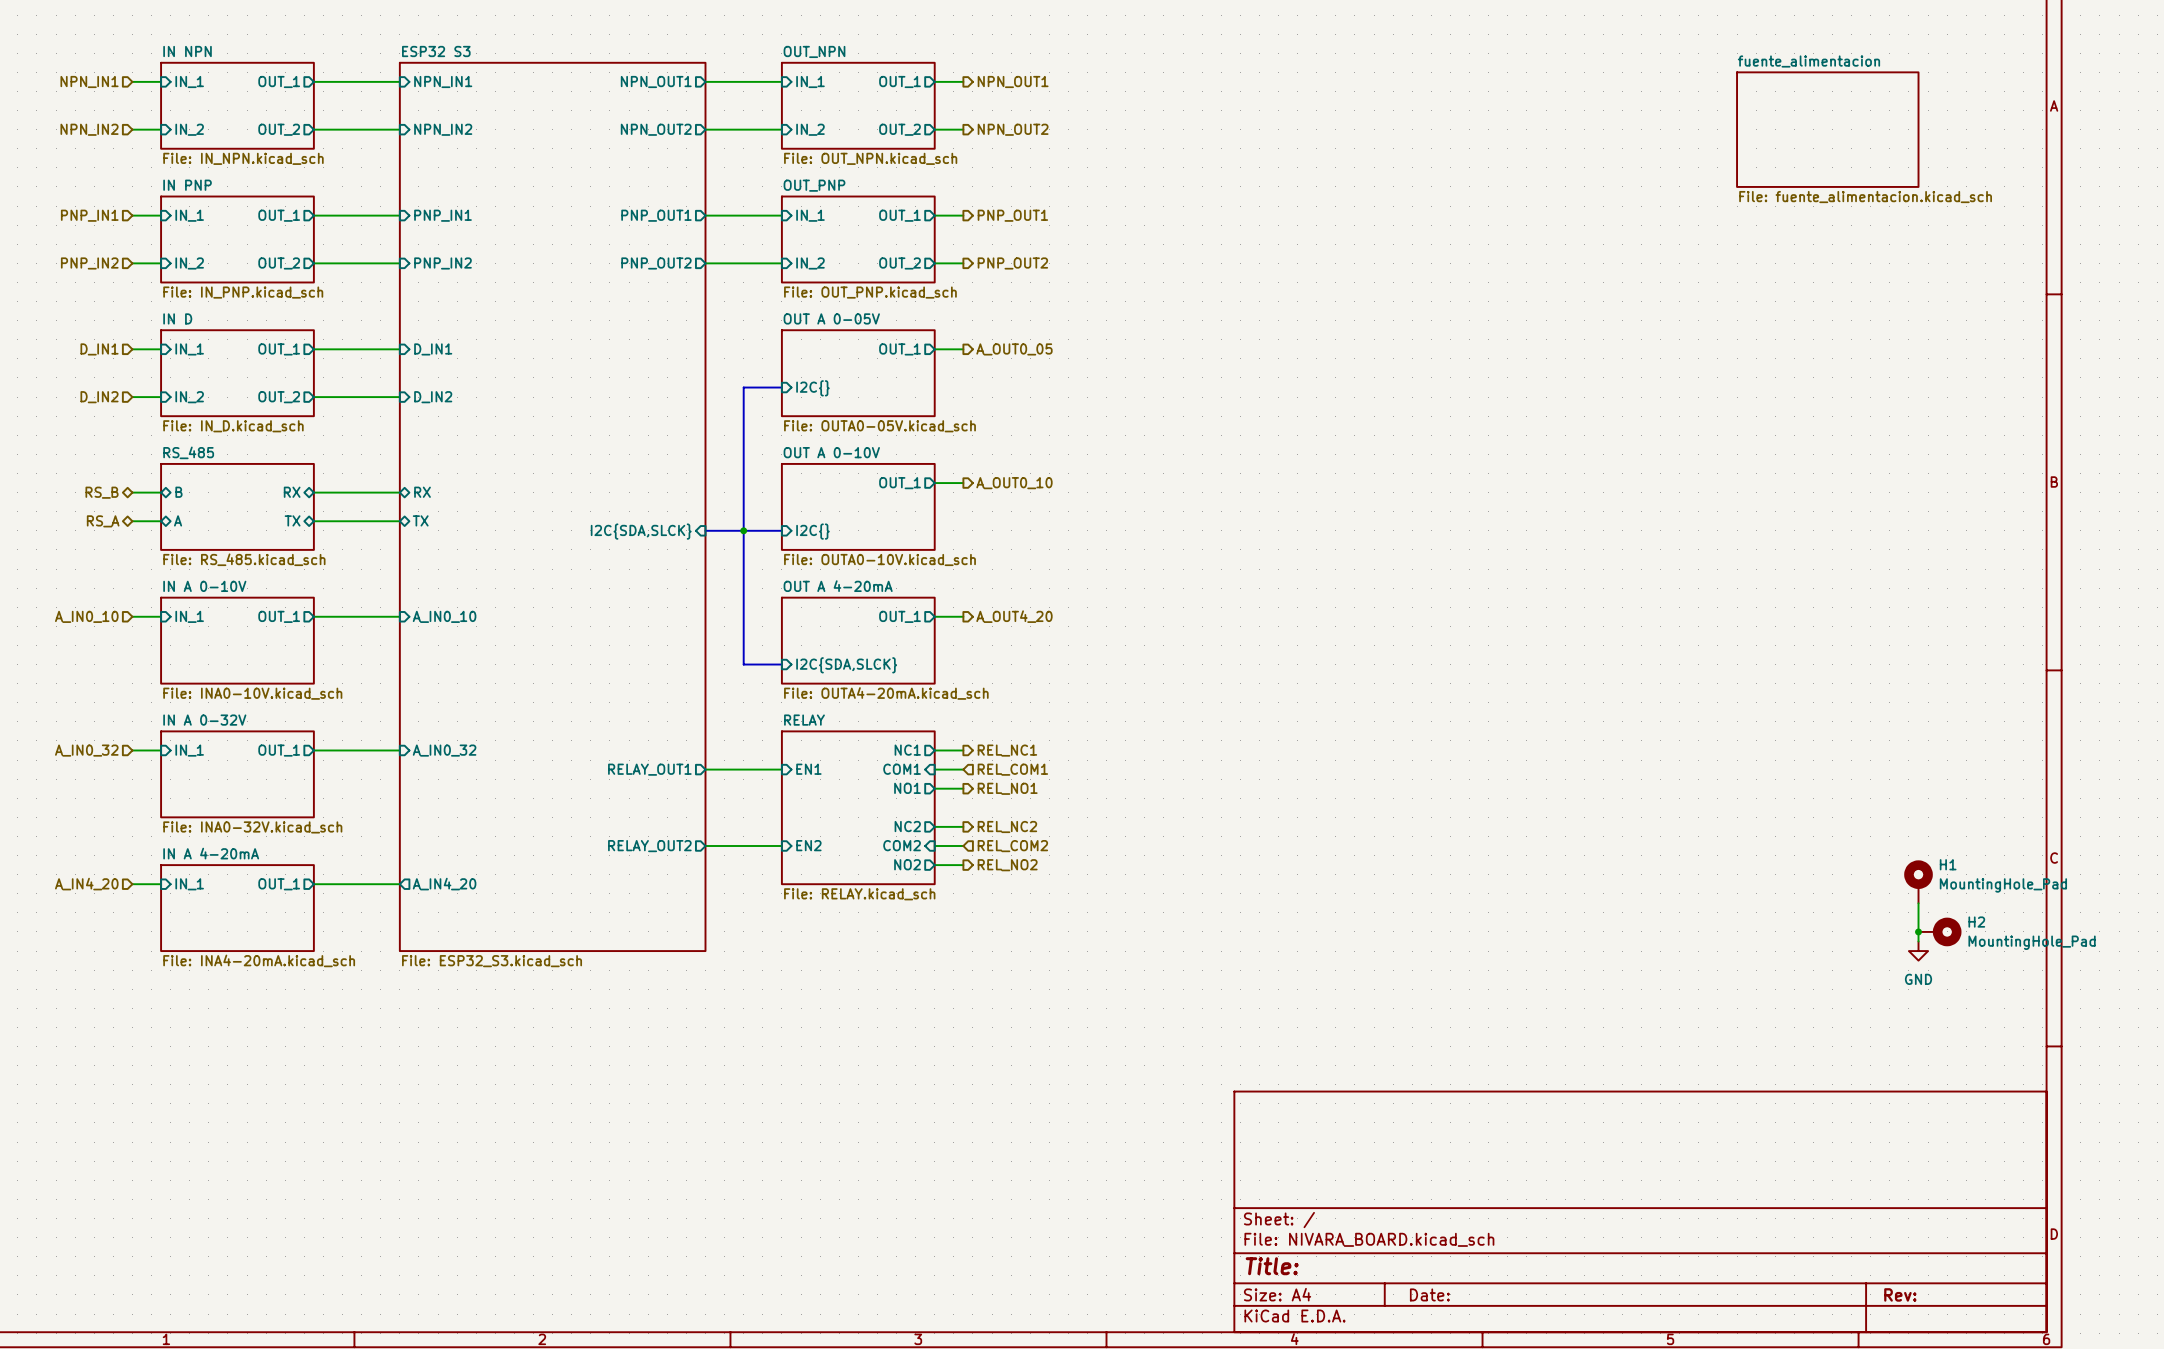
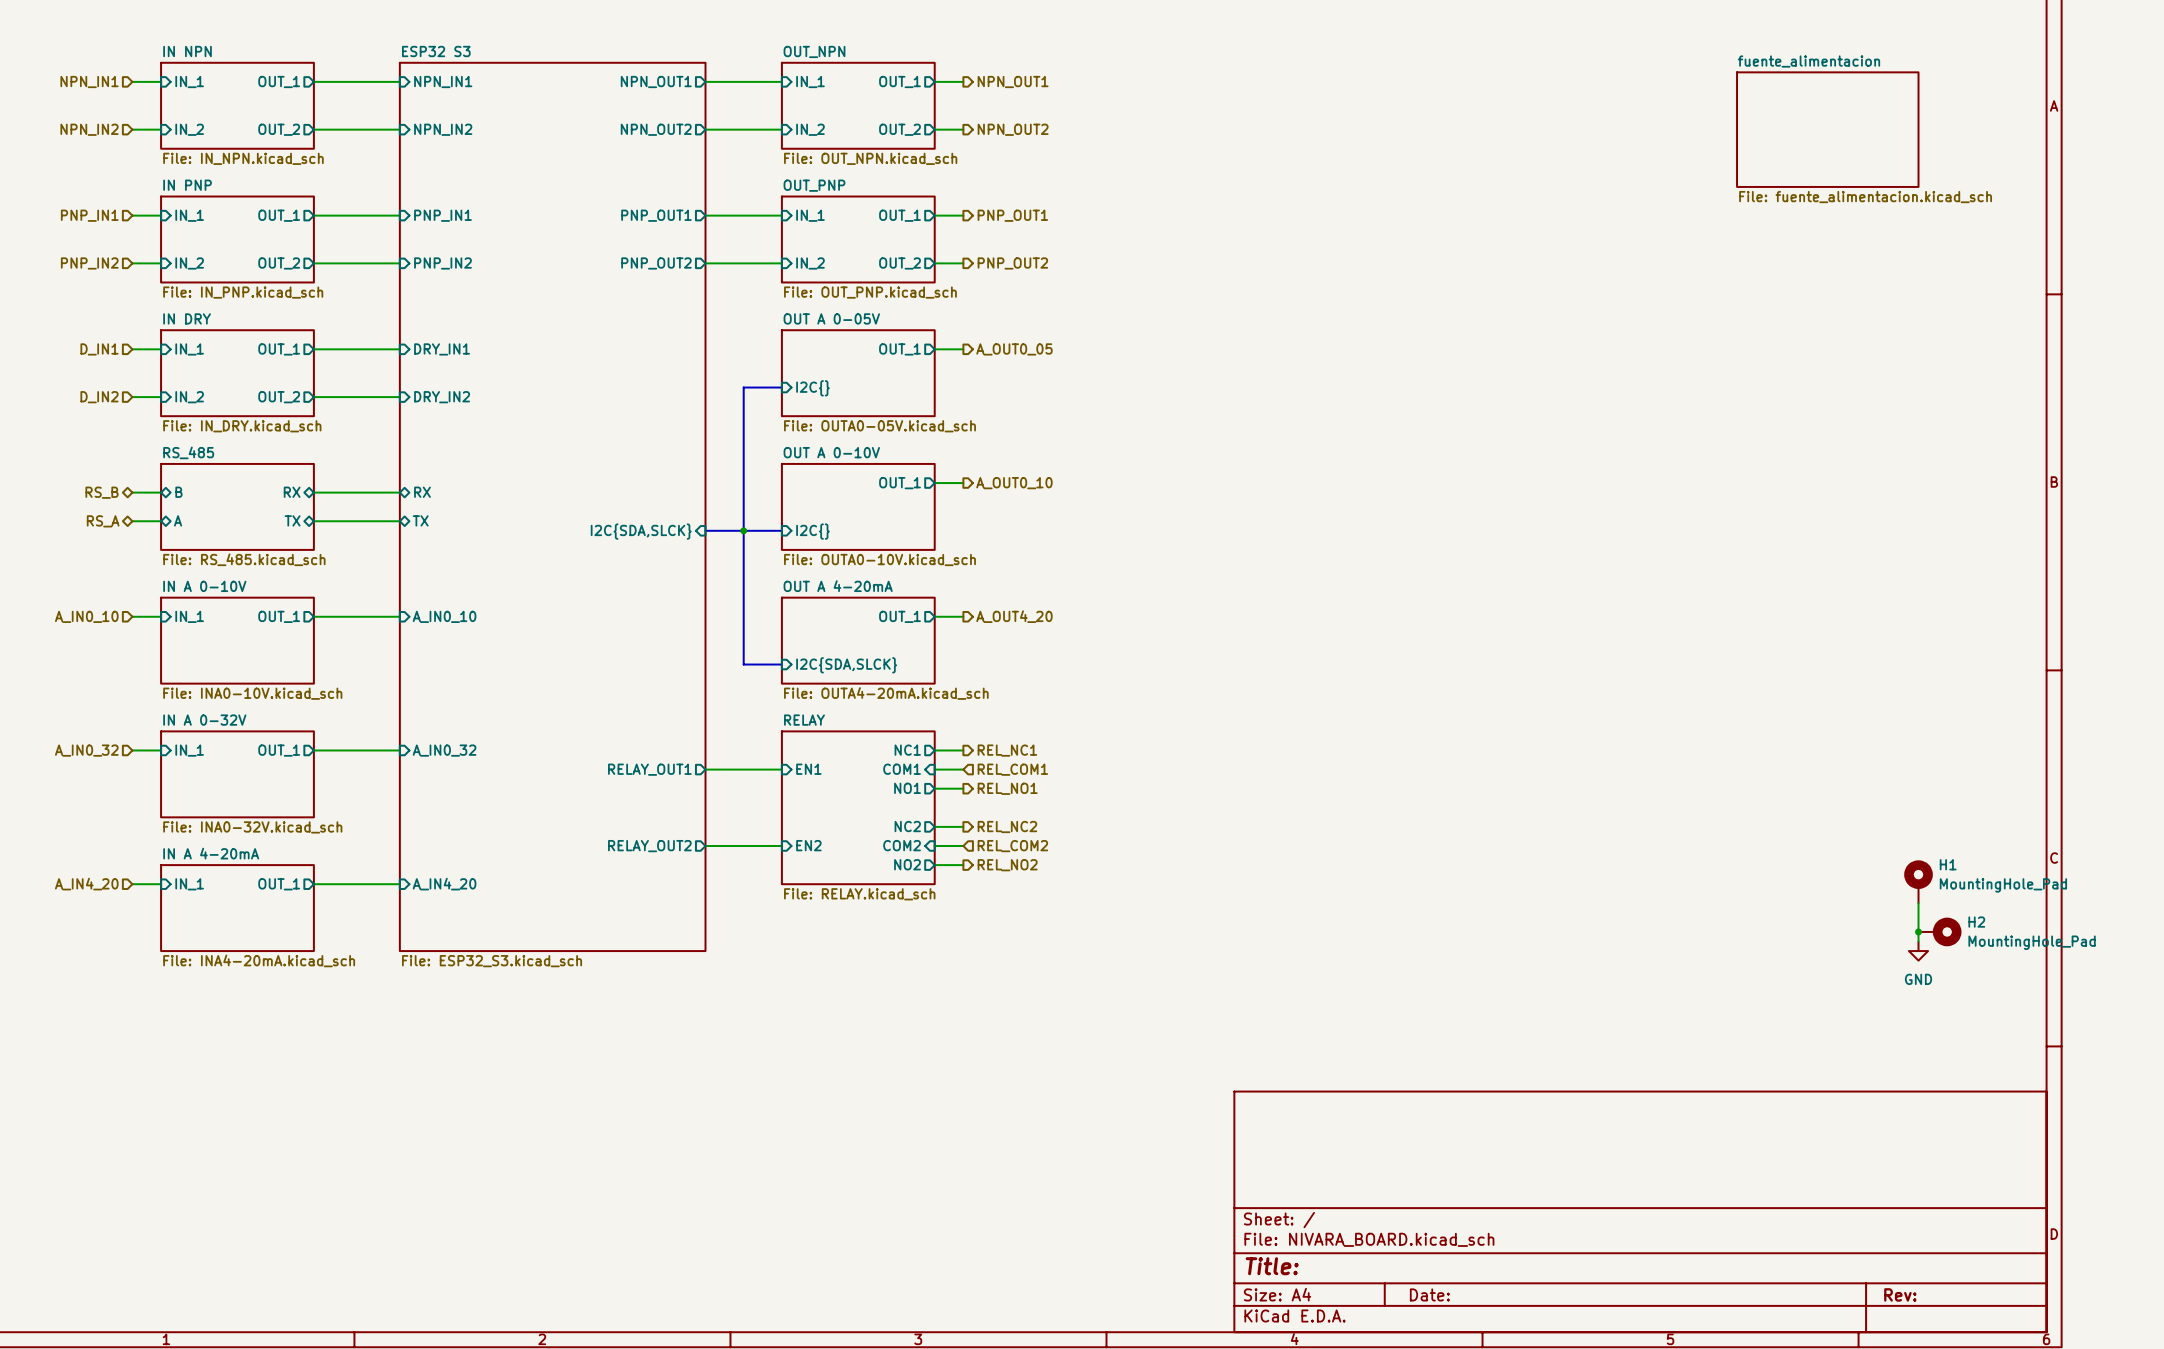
sheet IN D name: IN D (177, 318) -> IN DRY (187, 318)
sheet pin: D_IN1 (433, 349) -> DRY_IN1 (442, 349)
sheet pin: D_IN2 (433, 397) -> DRY_IN2 (442, 397)
sheet IN D value: File: IN_D.kicad_sch (233, 426) -> File: IN_DRY.kicad_sch (242, 426)
sheet pin shape: output (444, 884) -> input (444, 884)

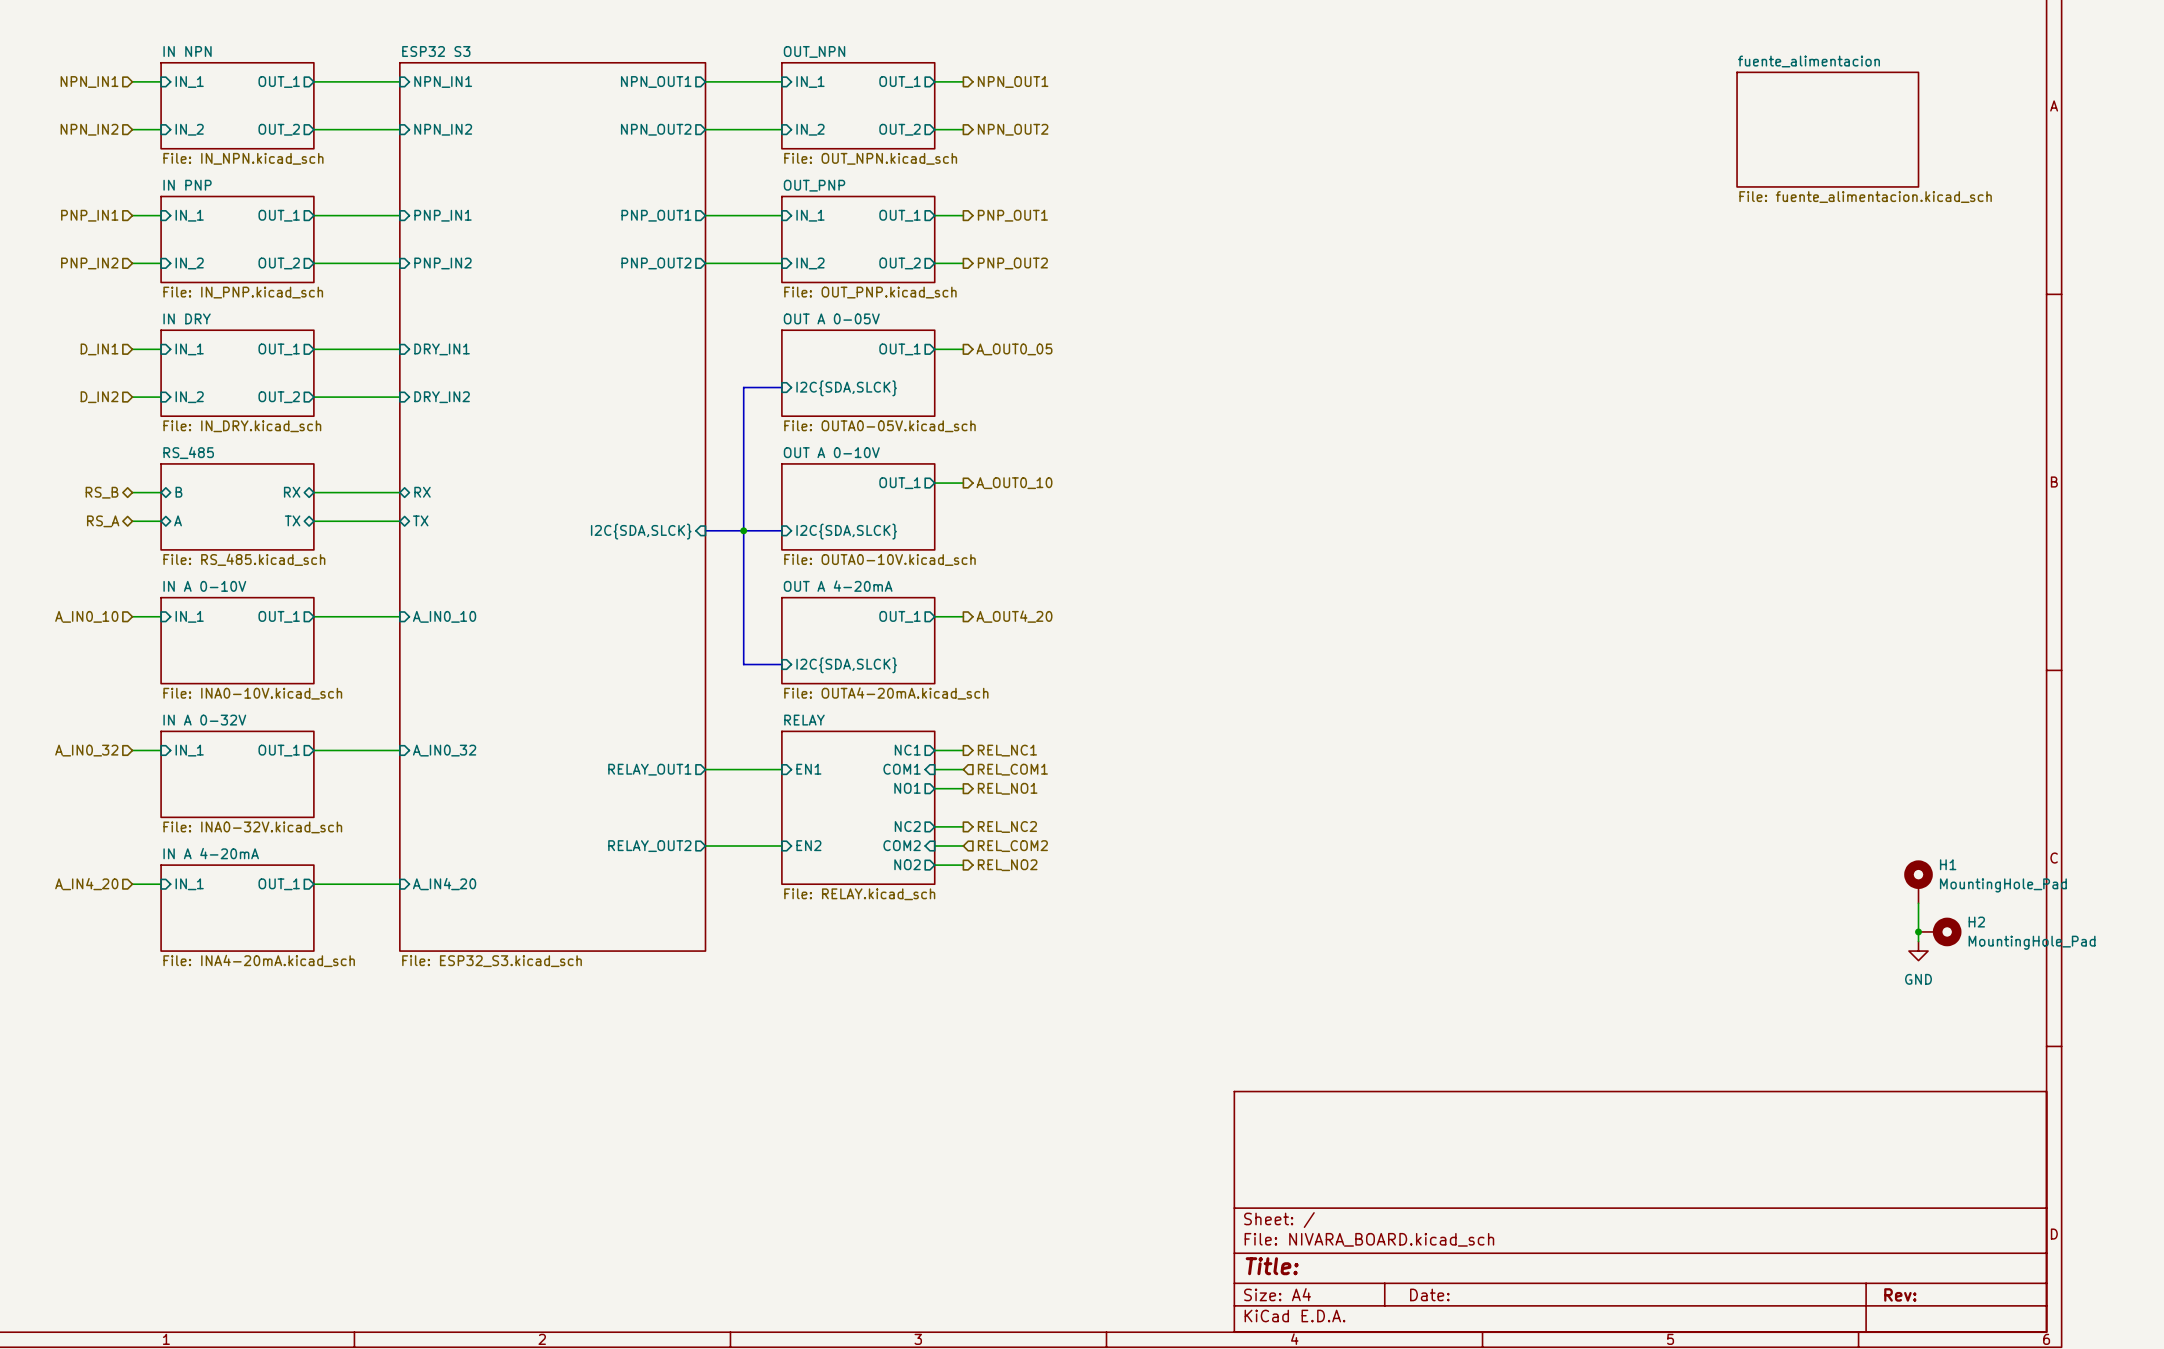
sheet pin: I2C{} (812, 388) -> I2C{SDA,SLCK} (846, 388)
sheet pin: I2C{} (812, 531) -> I2C{SDA,SLCK} (846, 531)

